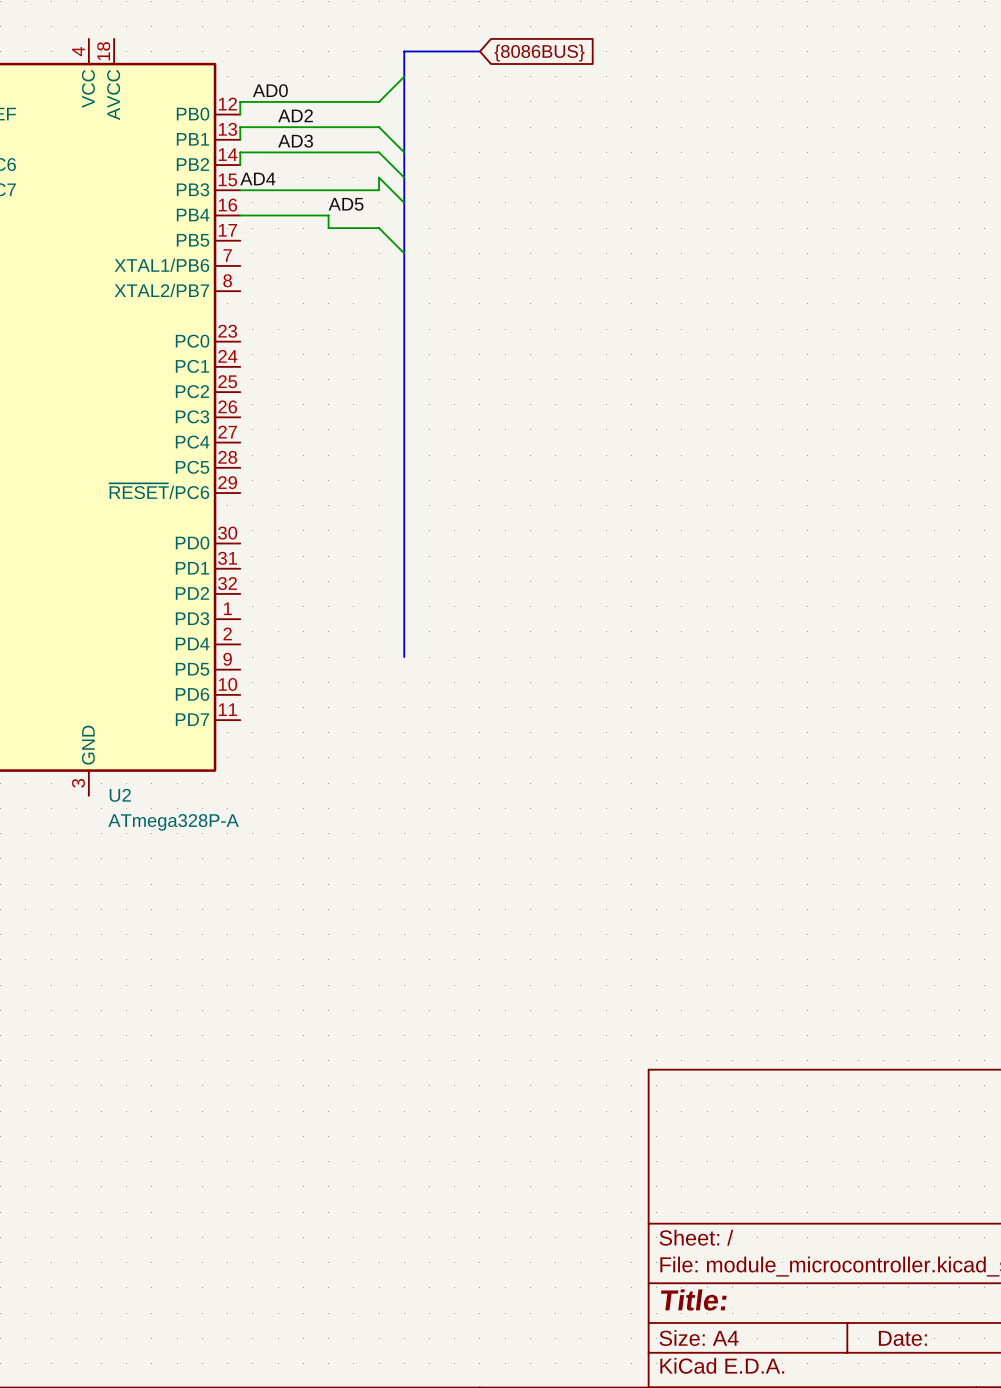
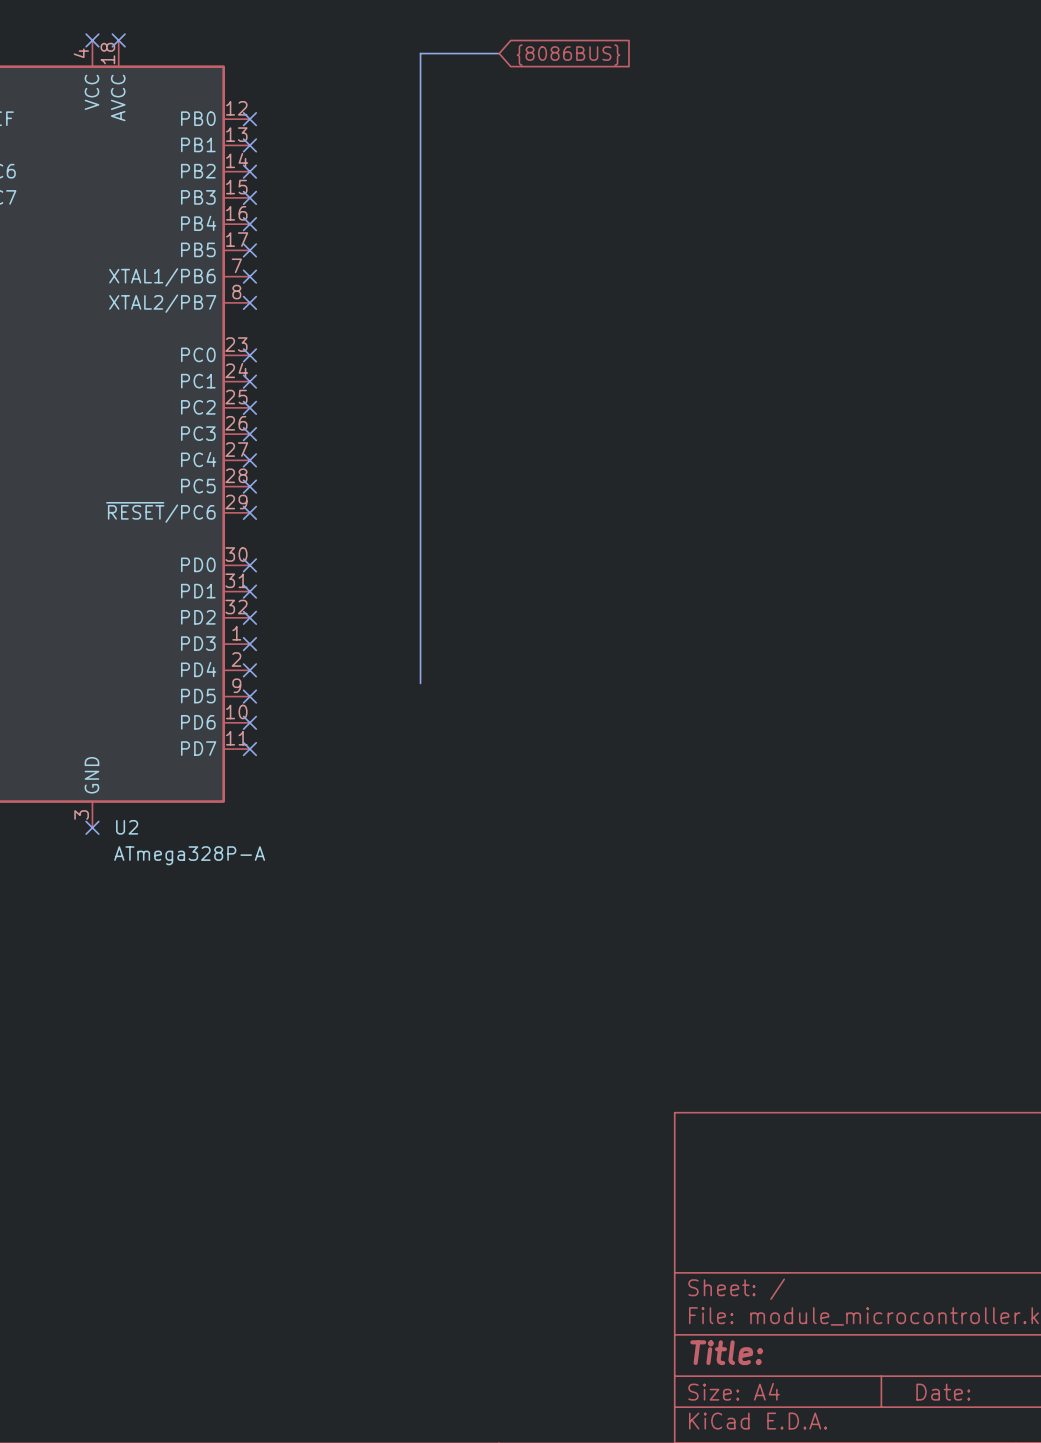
no-connect mark: none -> (92, 40)
no-connect mark: none -> (118, 40)
wire: (404, 76) (379, 101) (240, 101) (240, 114) -> none
label: AD0 (270, 90) -> none
no-connect mark: none -> (249, 119)
label: AD2 (295, 115) -> none
wire: (240, 139) (240, 127) (379, 127) (404, 152) -> none
no-connect mark: none -> (249, 145)
label: AD3 (295, 141) -> none
wire: (240, 165) (240, 152) (379, 152) (404, 177) -> none
no-connect mark: none -> (249, 171)
label: AD4 (257, 179) -> none
wire: (240, 190) (379, 190) (379, 177) (404, 202) -> none
no-connect mark: none -> (249, 197)
label: AD5 (346, 204) -> none
wire: (240, 215) (328, 215) (328, 228) (379, 228) (404, 253) -> none
no-connect mark: none -> (249, 224)
no-connect mark: none -> (249, 250)
no-connect mark: none -> (249, 276)
no-connect mark: none -> (249, 302)
no-connect mark: none -> (249, 355)
no-connect mark: none -> (249, 381)
no-connect mark: none -> (249, 407)
no-connect mark: none -> (249, 434)
no-connect mark: none -> (249, 460)
no-connect mark: none -> (249, 486)
no-connect mark: none -> (249, 512)
no-connect mark: none -> (249, 565)
no-connect mark: none -> (249, 591)
no-connect mark: none -> (249, 617)
no-connect mark: none -> (249, 644)
no-connect mark: none -> (249, 670)
no-connect mark: none -> (249, 696)
no-connect mark: none -> (249, 722)
no-connect mark: none -> (249, 749)
no-connect mark: none -> (92, 827)

